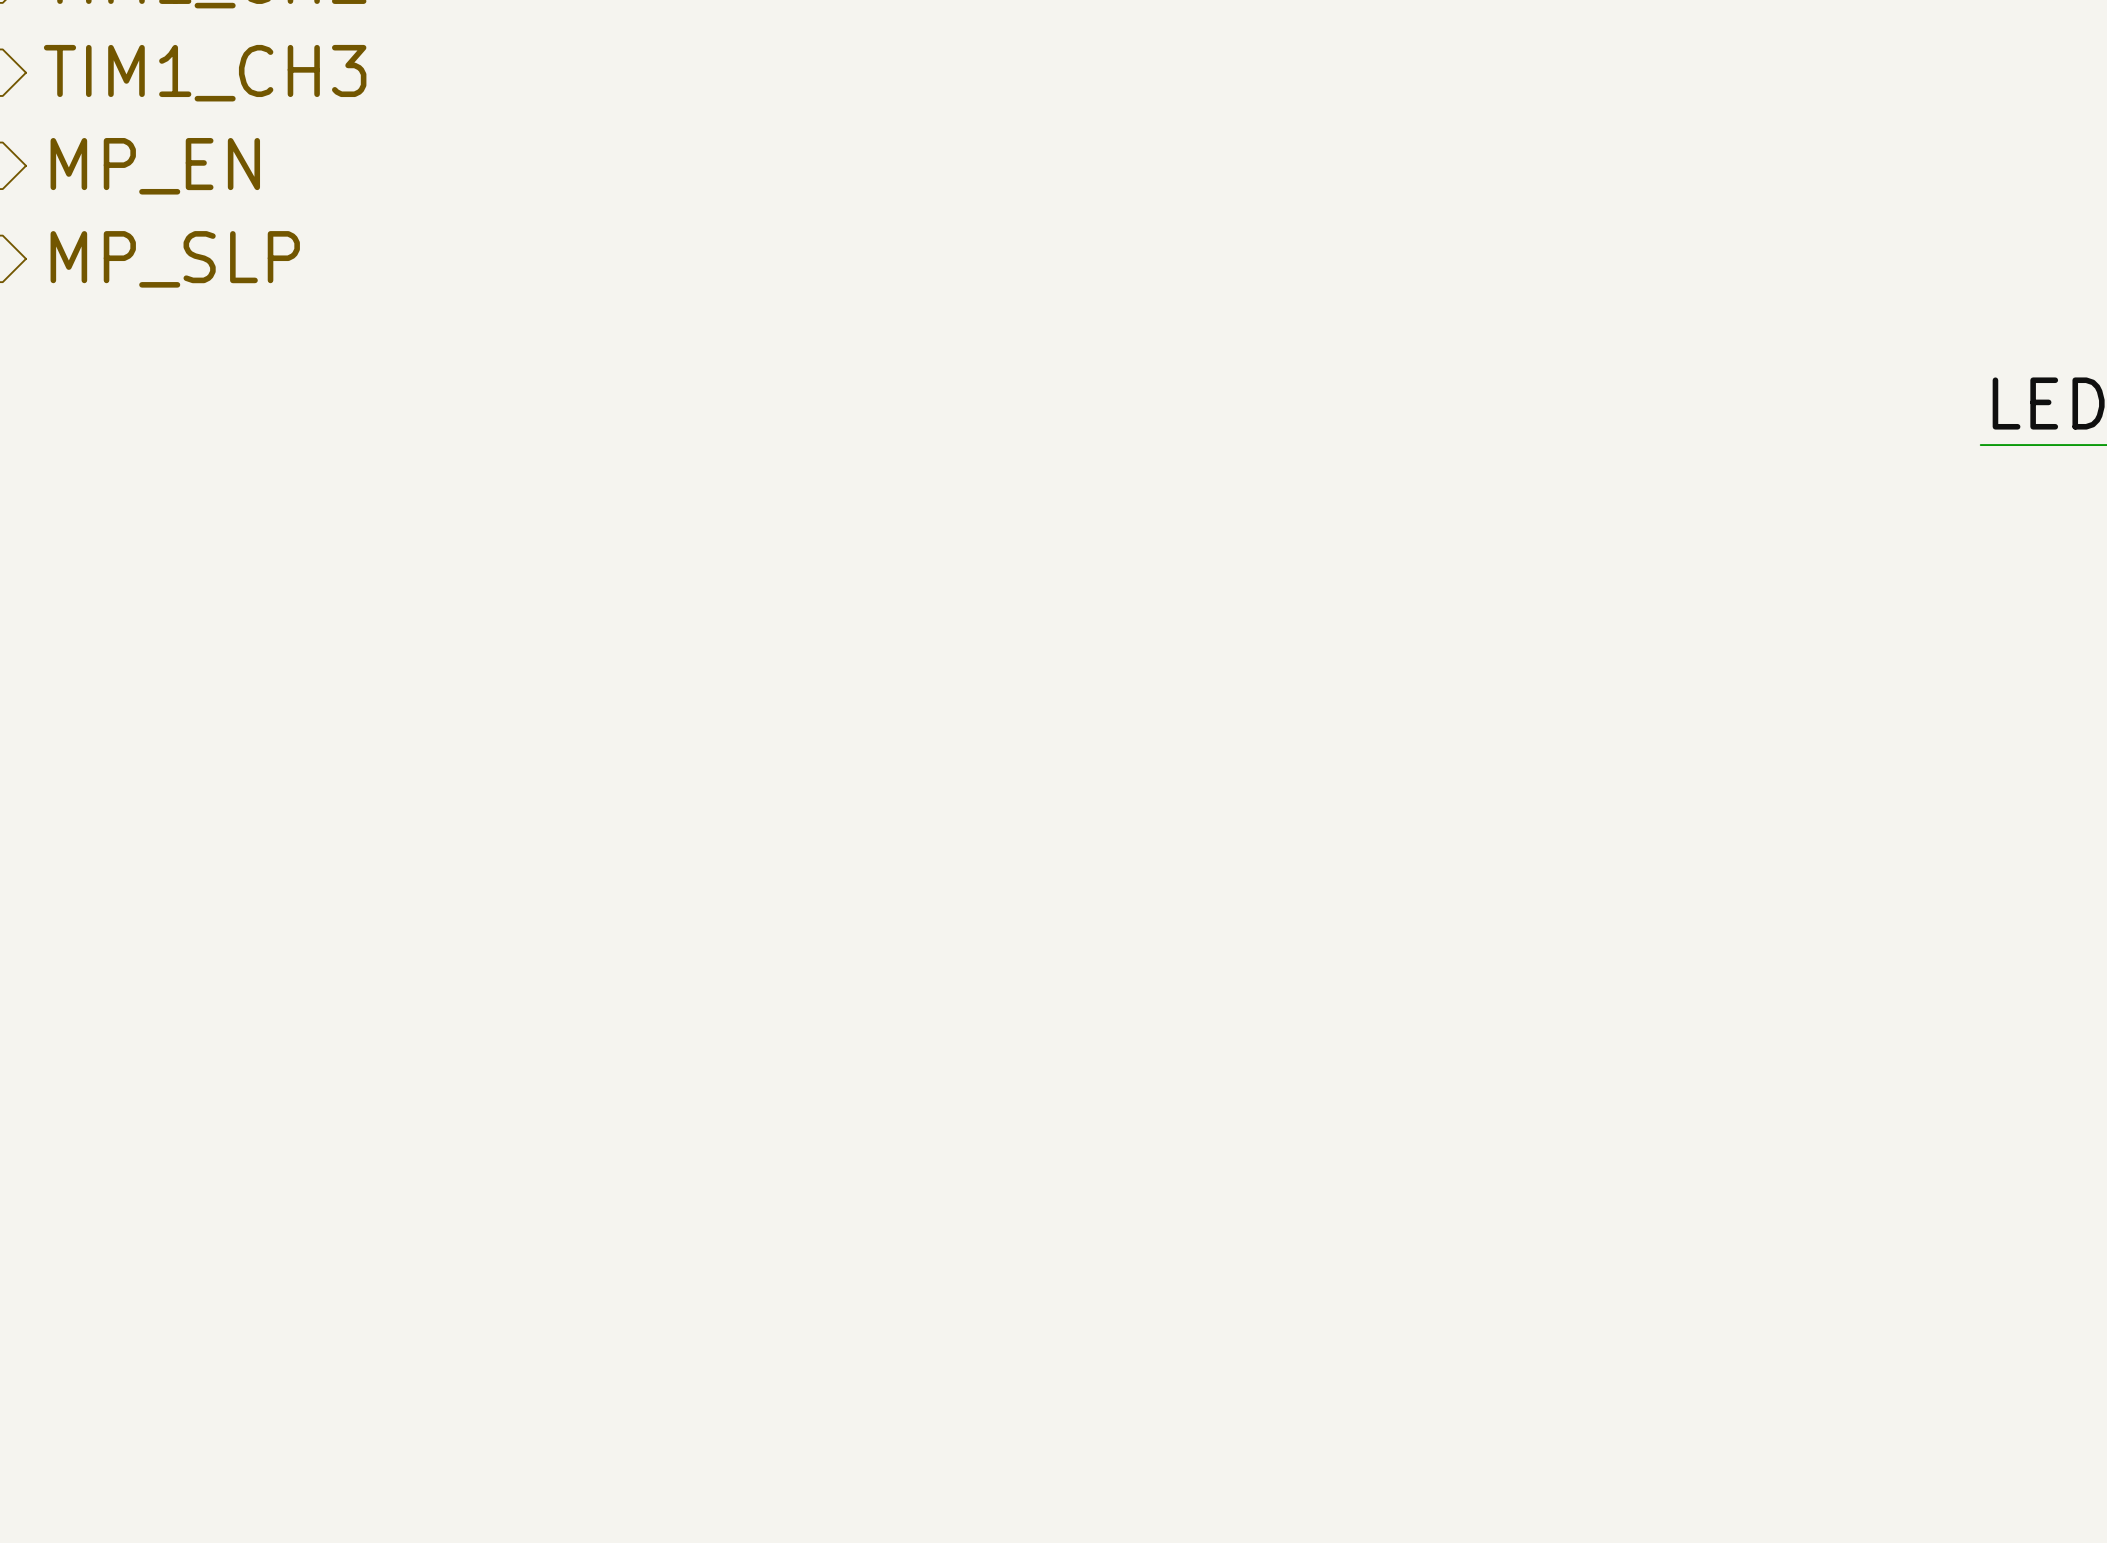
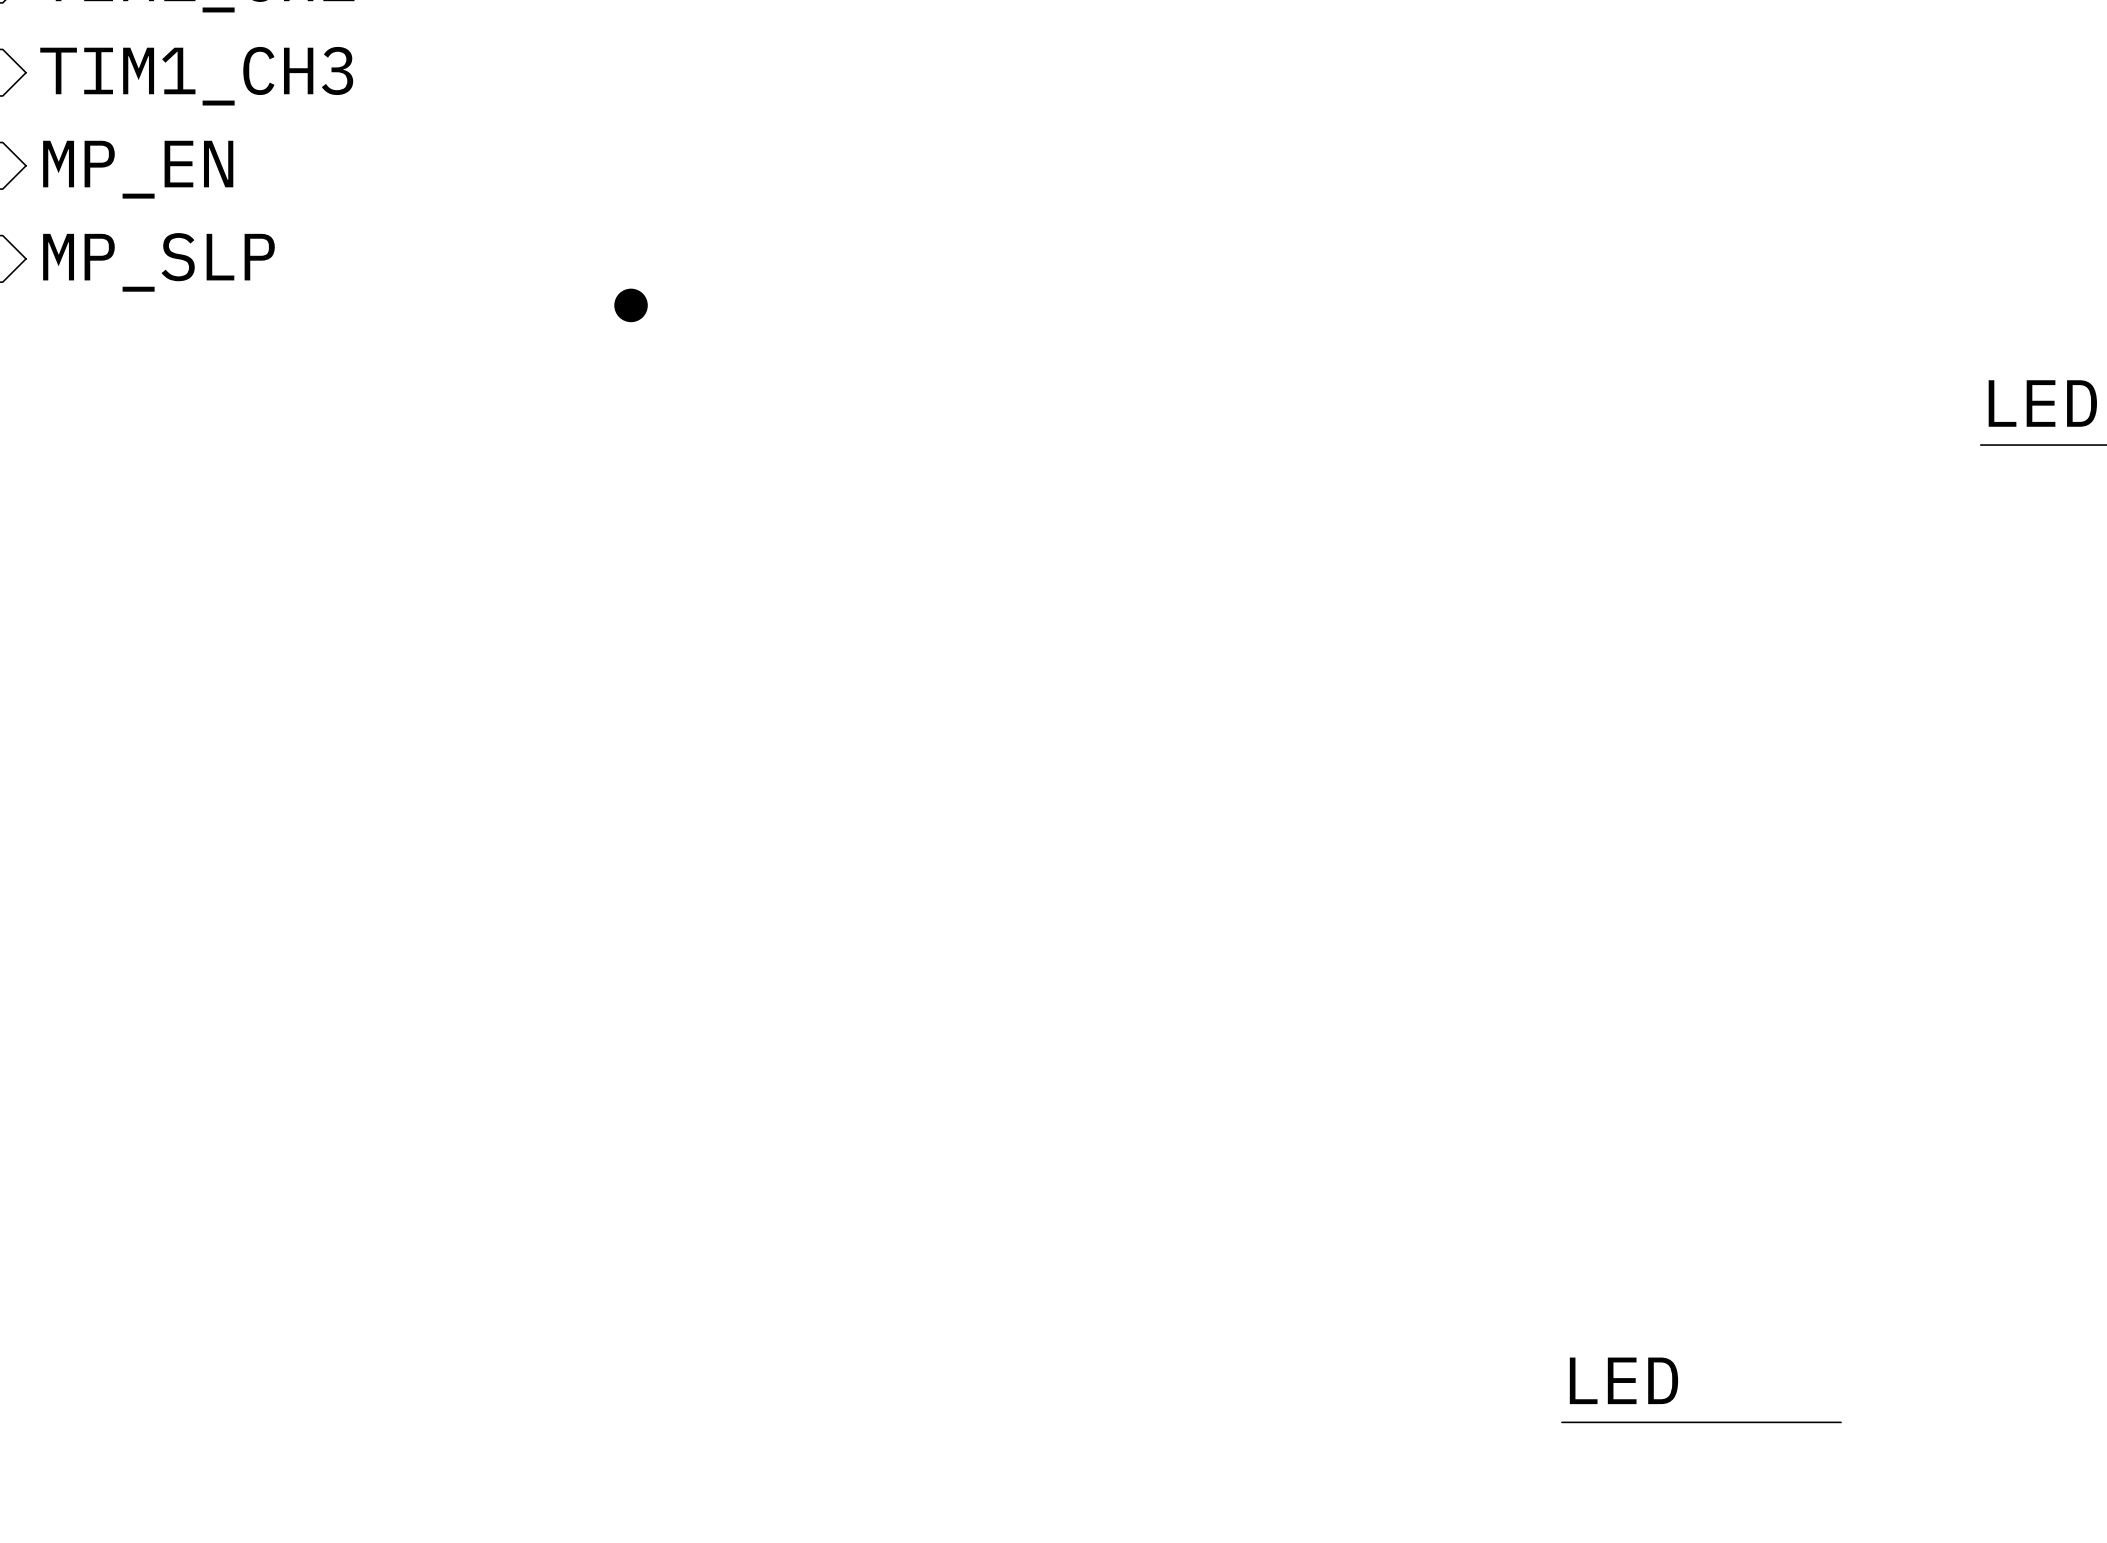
junction: none -> (631, 305)
label: none -> LED (1623, 1380)
wire: none -> (1561, 1422) (1841, 1422)

